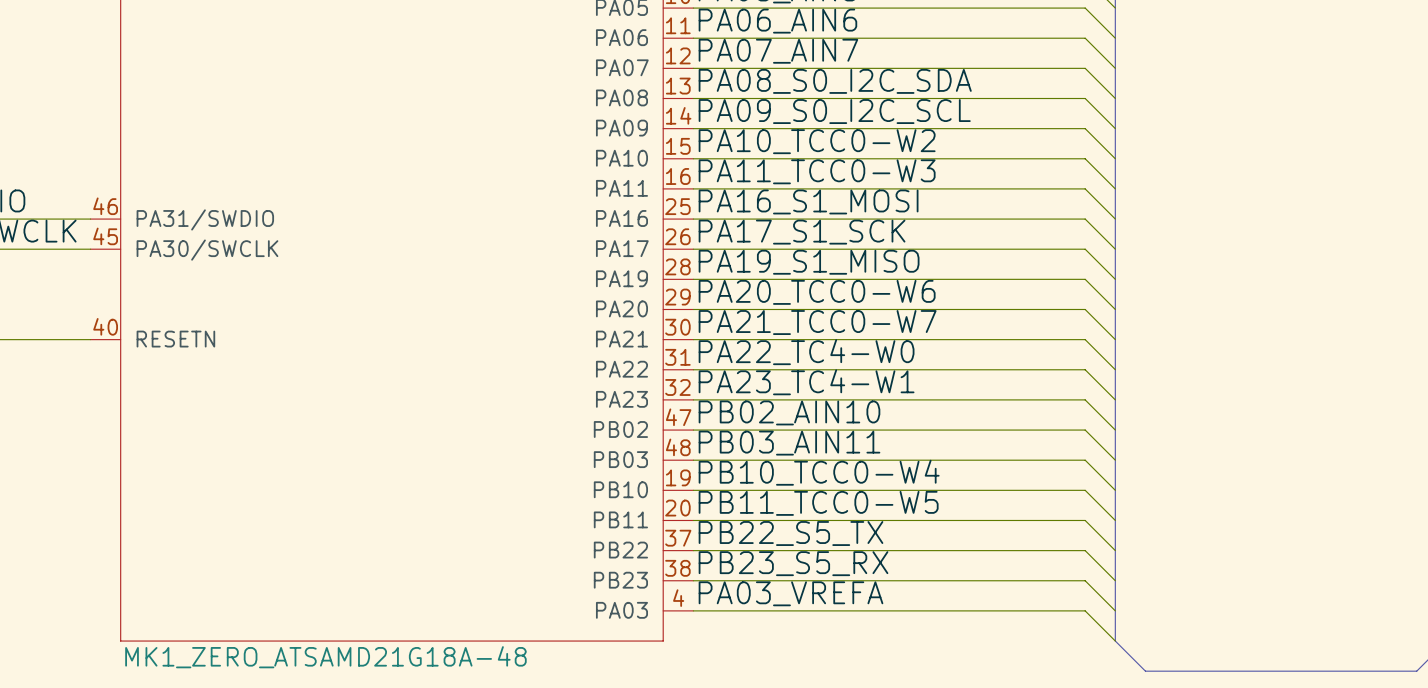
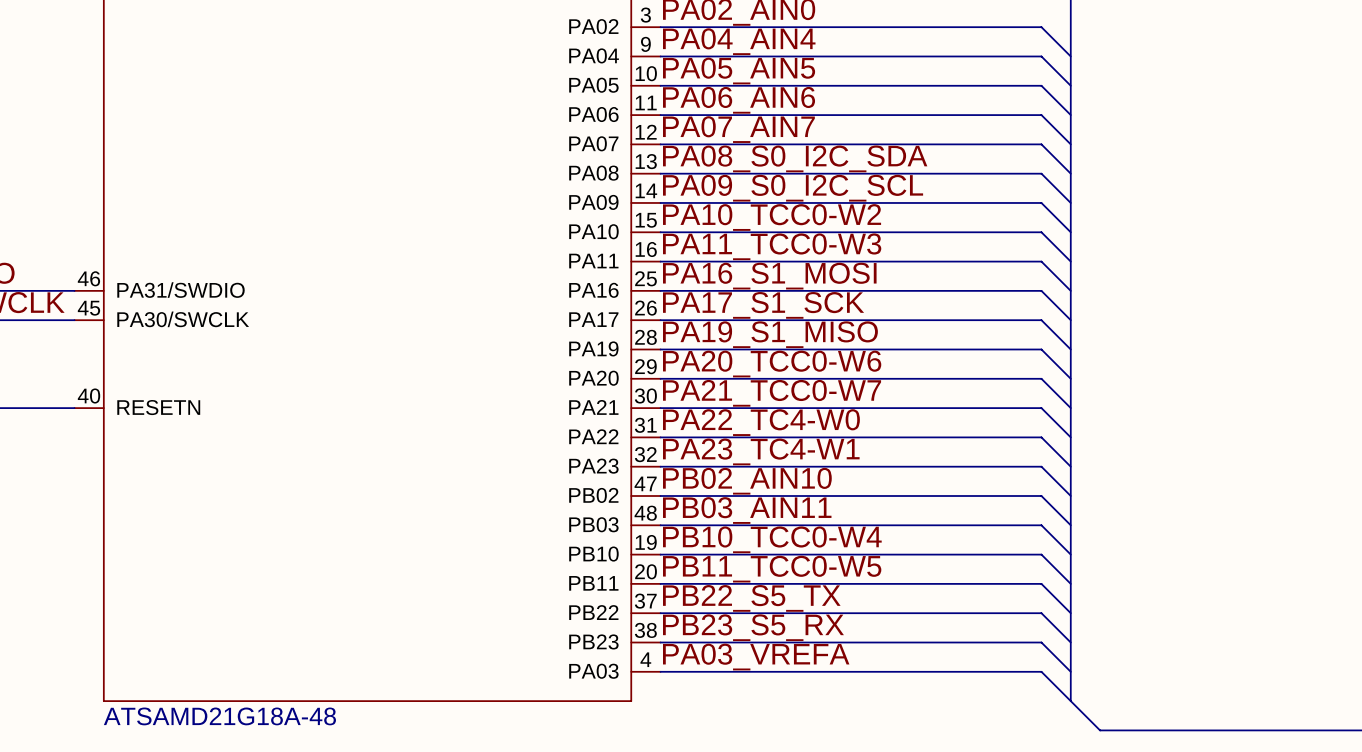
part value: MK1_ZERO_ATSAMD21G18A-48 (325, 657) -> ATSAMD21G18A-48 (219, 716)

